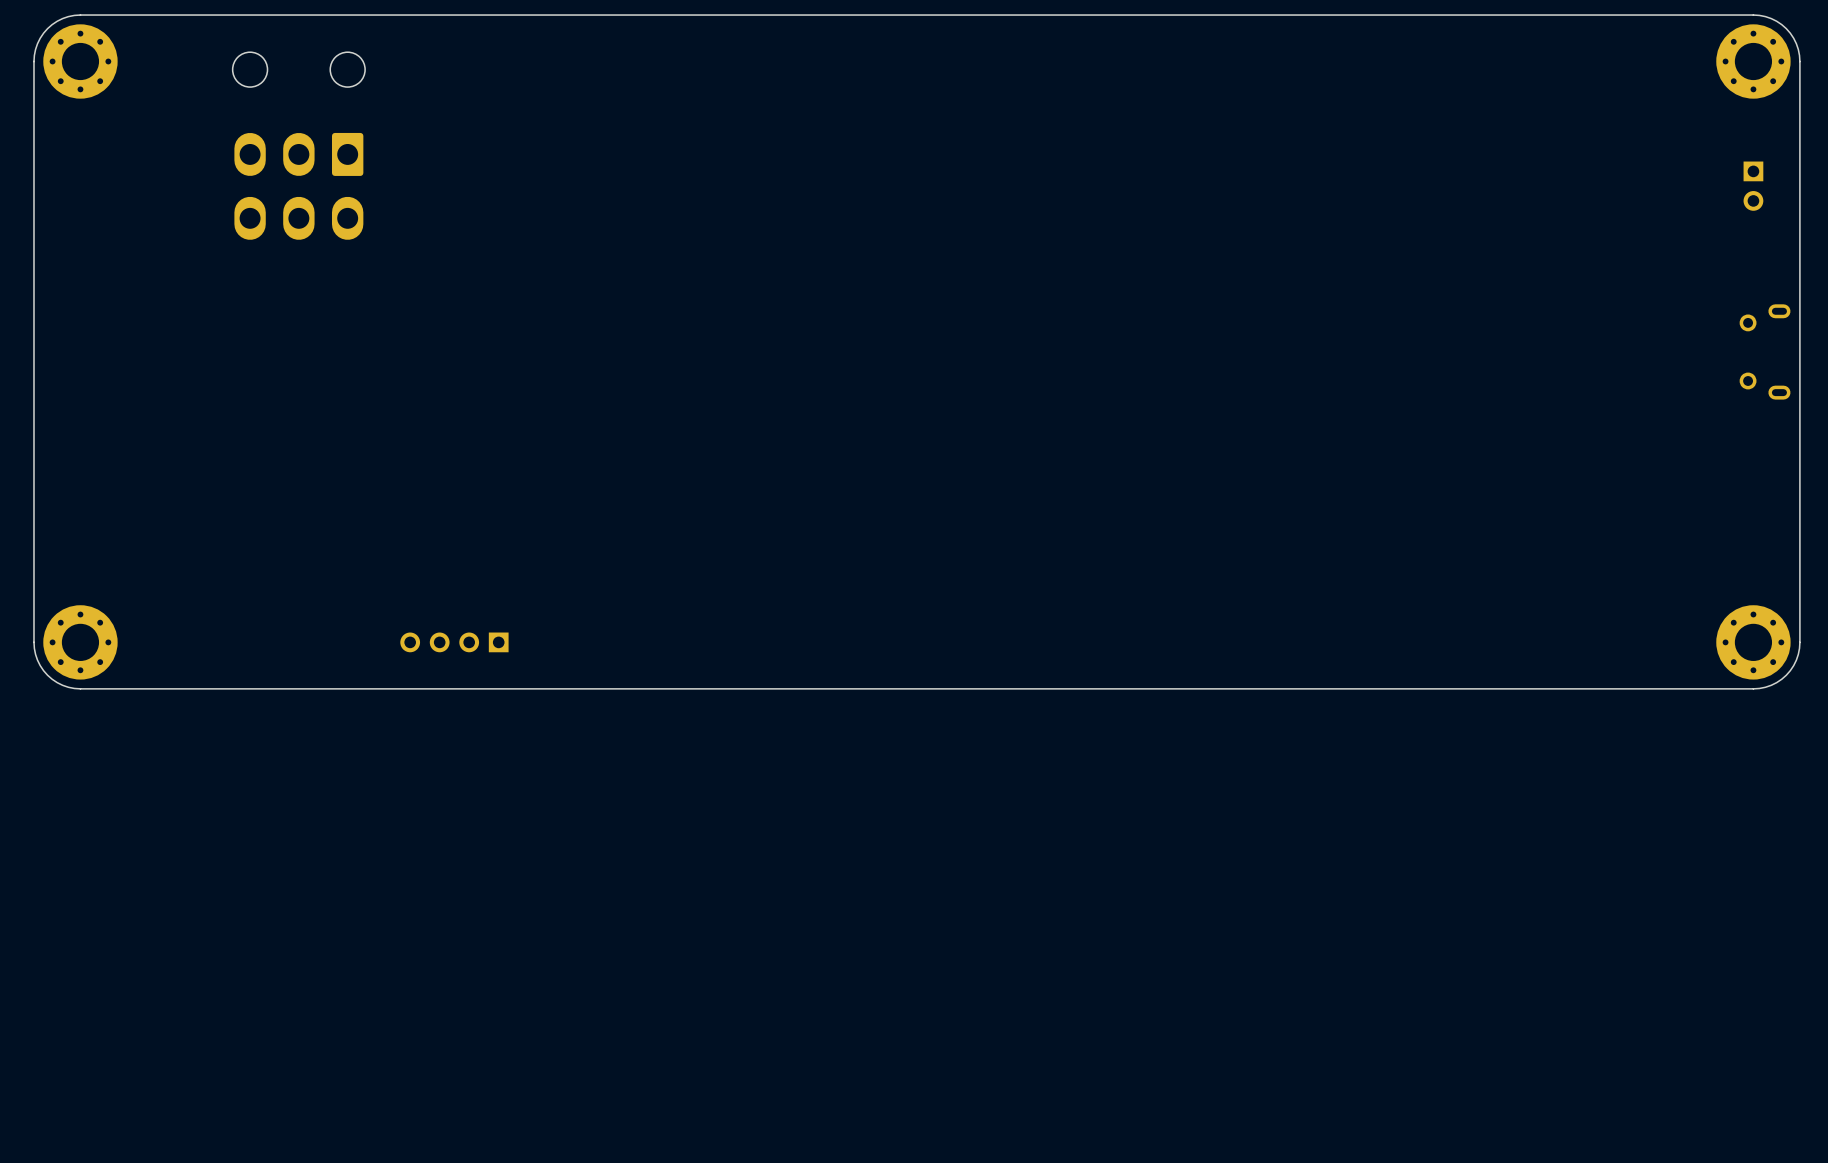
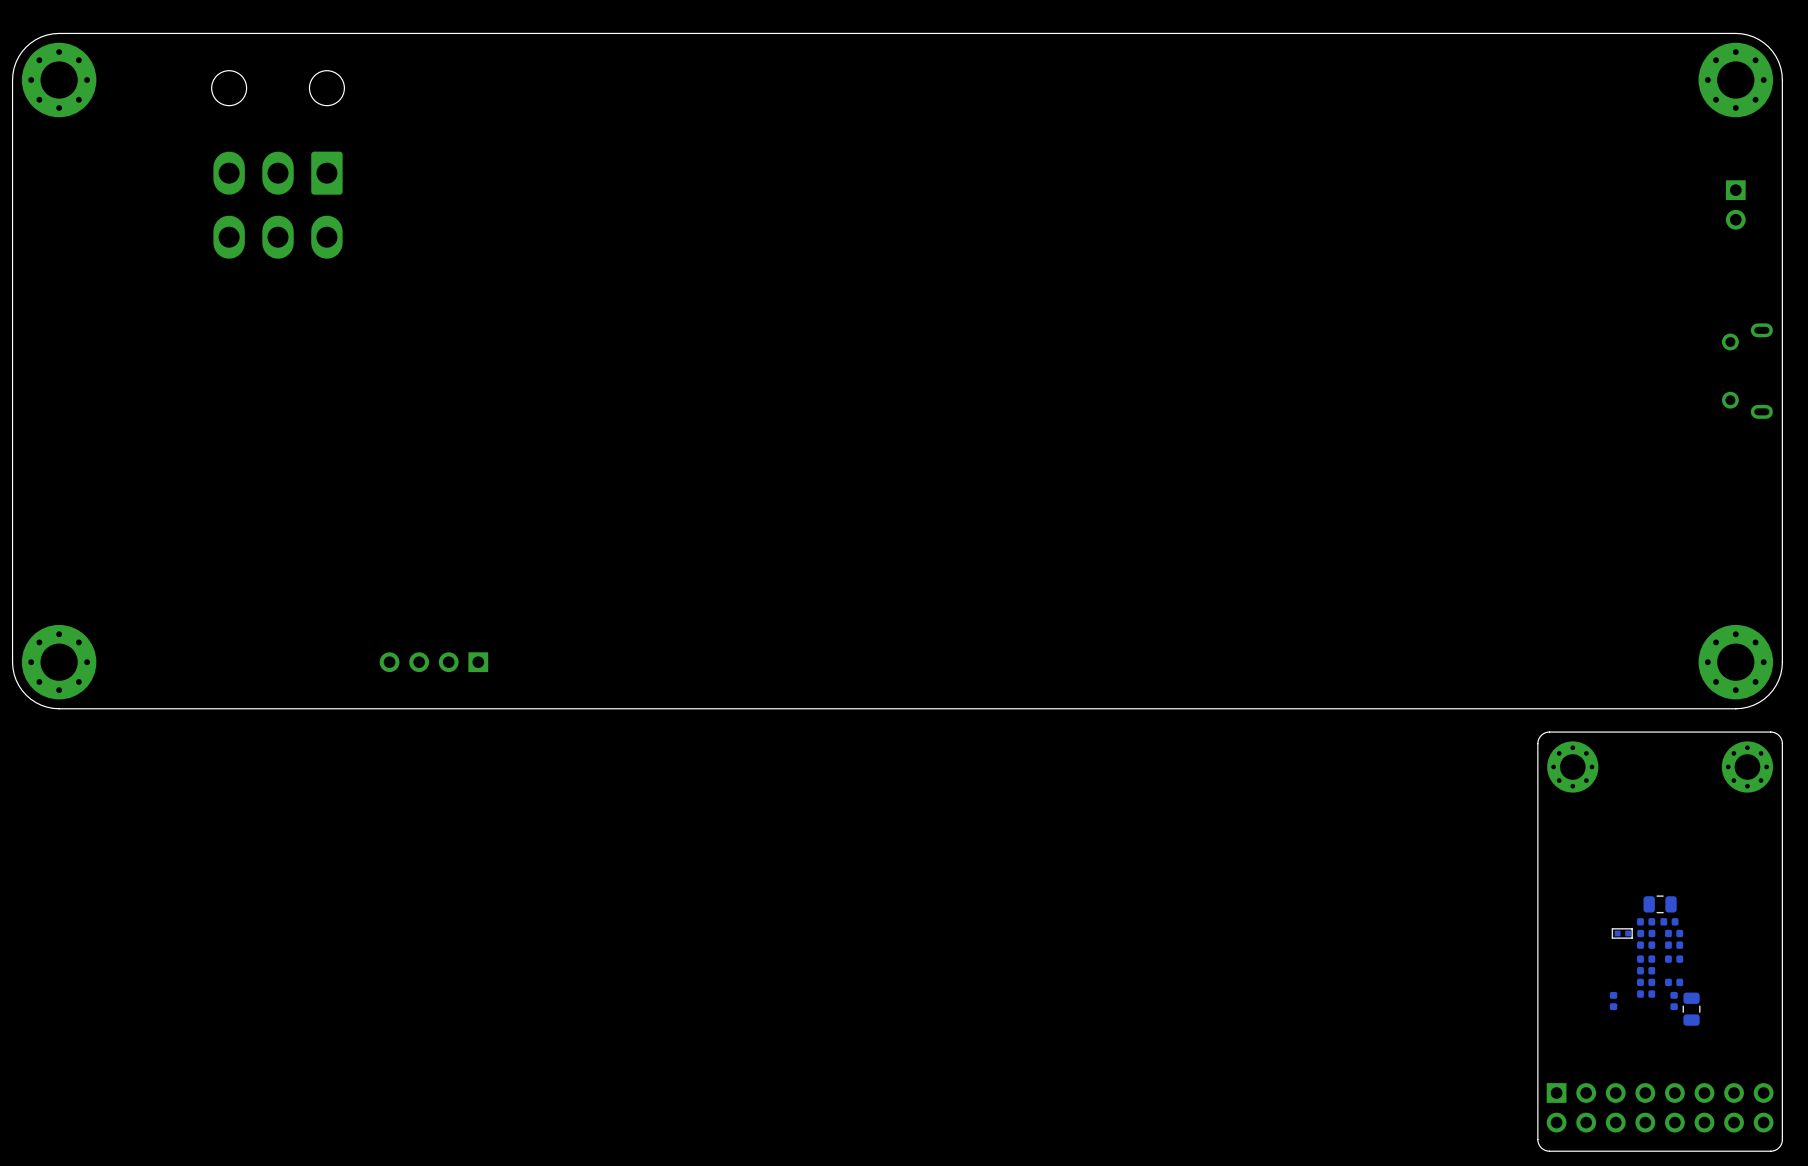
board edge: none -> (1770, 732) (1549, 732) (1543, 733) (1539, 737) (1537, 743) (1537, 1139) (1539, 1145) (1543, 1149) (1549, 1151) (1770, 1151) (1776, 1149) (1780, 1145) (1782, 1139) (1782, 743) (1778, 735) (1770, 732)
part: none -> (1572, 766)
part: none -> (1747, 766)
part: none -> (1660, 904)
part: none -> (1646, 921)
part: none -> (1669, 921)
part: none -> (1622, 933)
part: none -> (1646, 933)
part: none -> (1674, 933)
part: none -> (1646, 945)
part: none -> (1674, 945)
part: none -> (1646, 959)
part: none -> (1674, 959)
part: none -> (1646, 970)
part: none -> (1646, 982)
part: none -> (1674, 982)
part: none -> (1646, 994)
part: none -> (1613, 1001)
part: none -> (1674, 1001)
part: none -> (1691, 1009)
part: none -> (1660, 1107)

